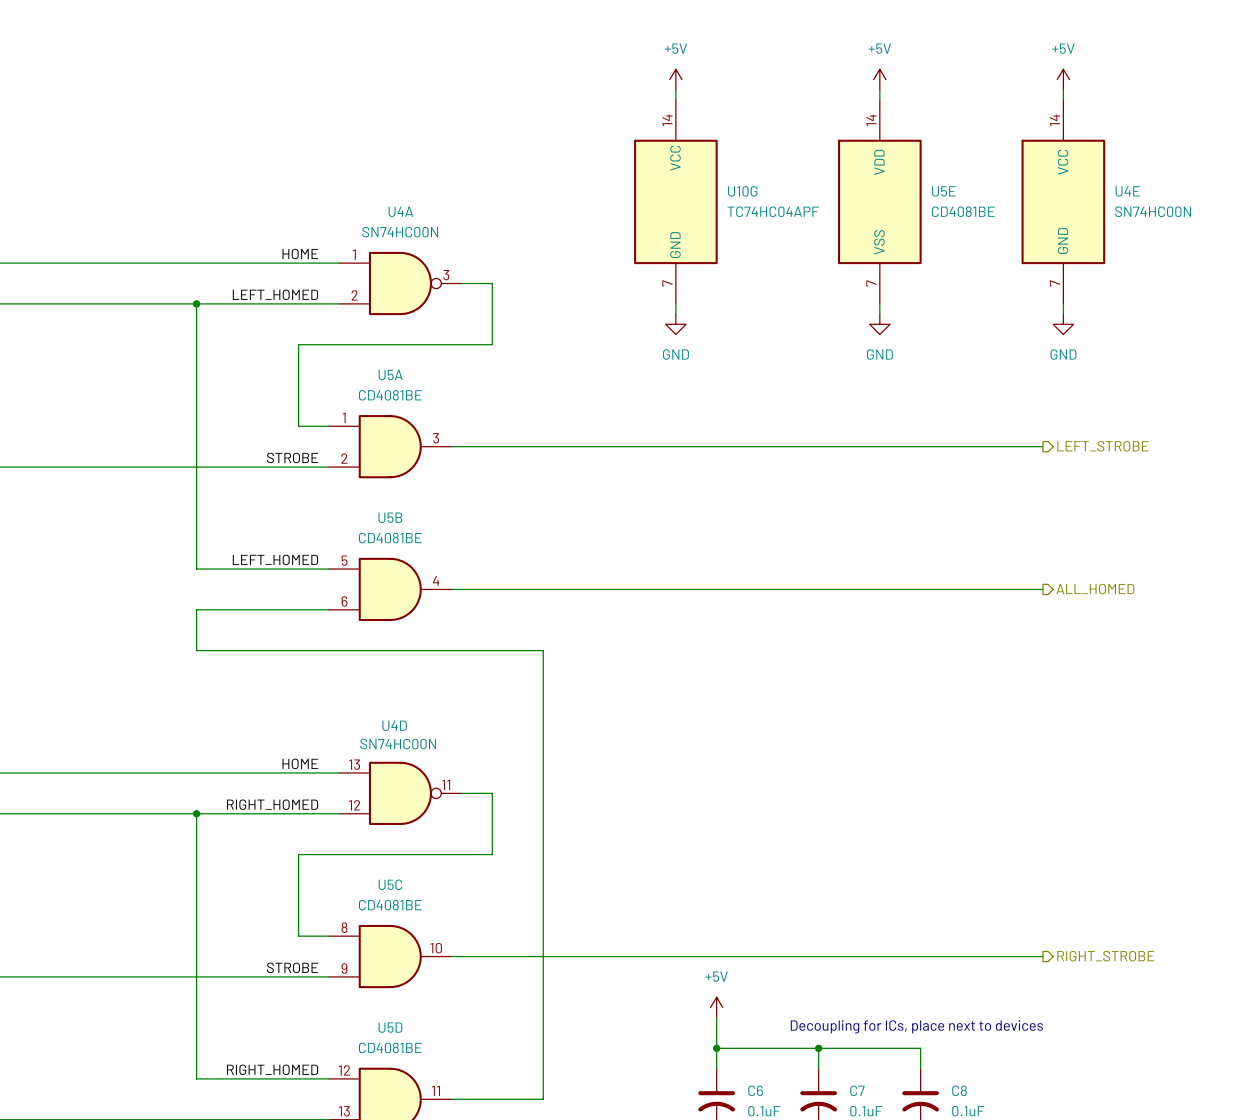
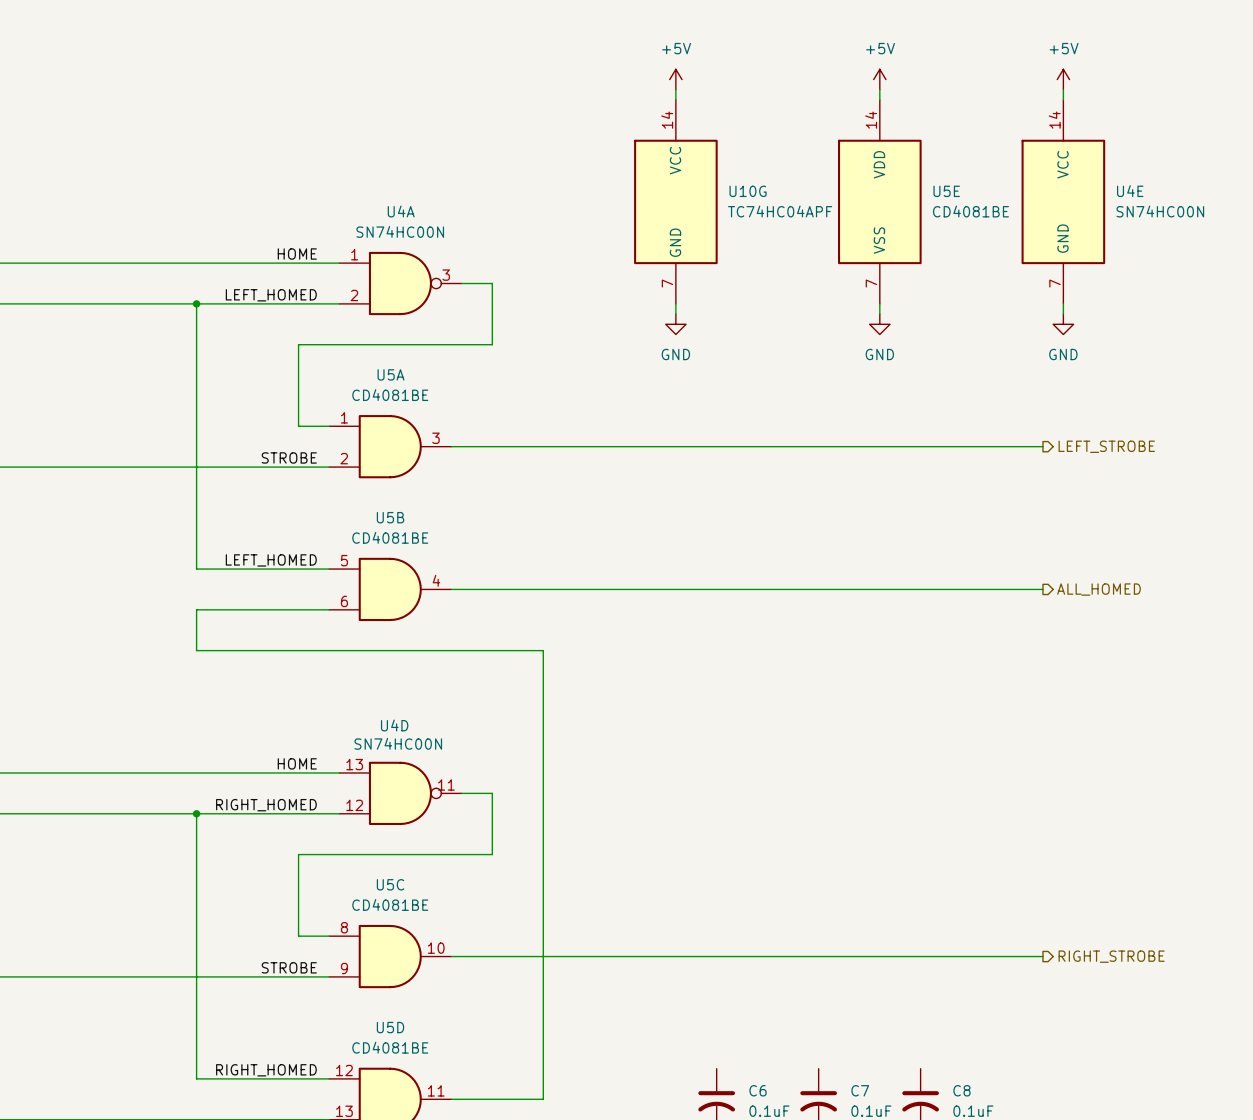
power symbol: +5V (716, 1007) -> none
wire: (716, 1017) (716, 1068) -> none
text: Decoupling for ICs, place next to devices (916, 1026) -> none
wire: (716, 1048) (920, 1048) (920, 1068) -> none
junction: (716, 1048) -> none
wire: (818, 1048) (818, 1068) -> none
junction: (818, 1048) -> none

